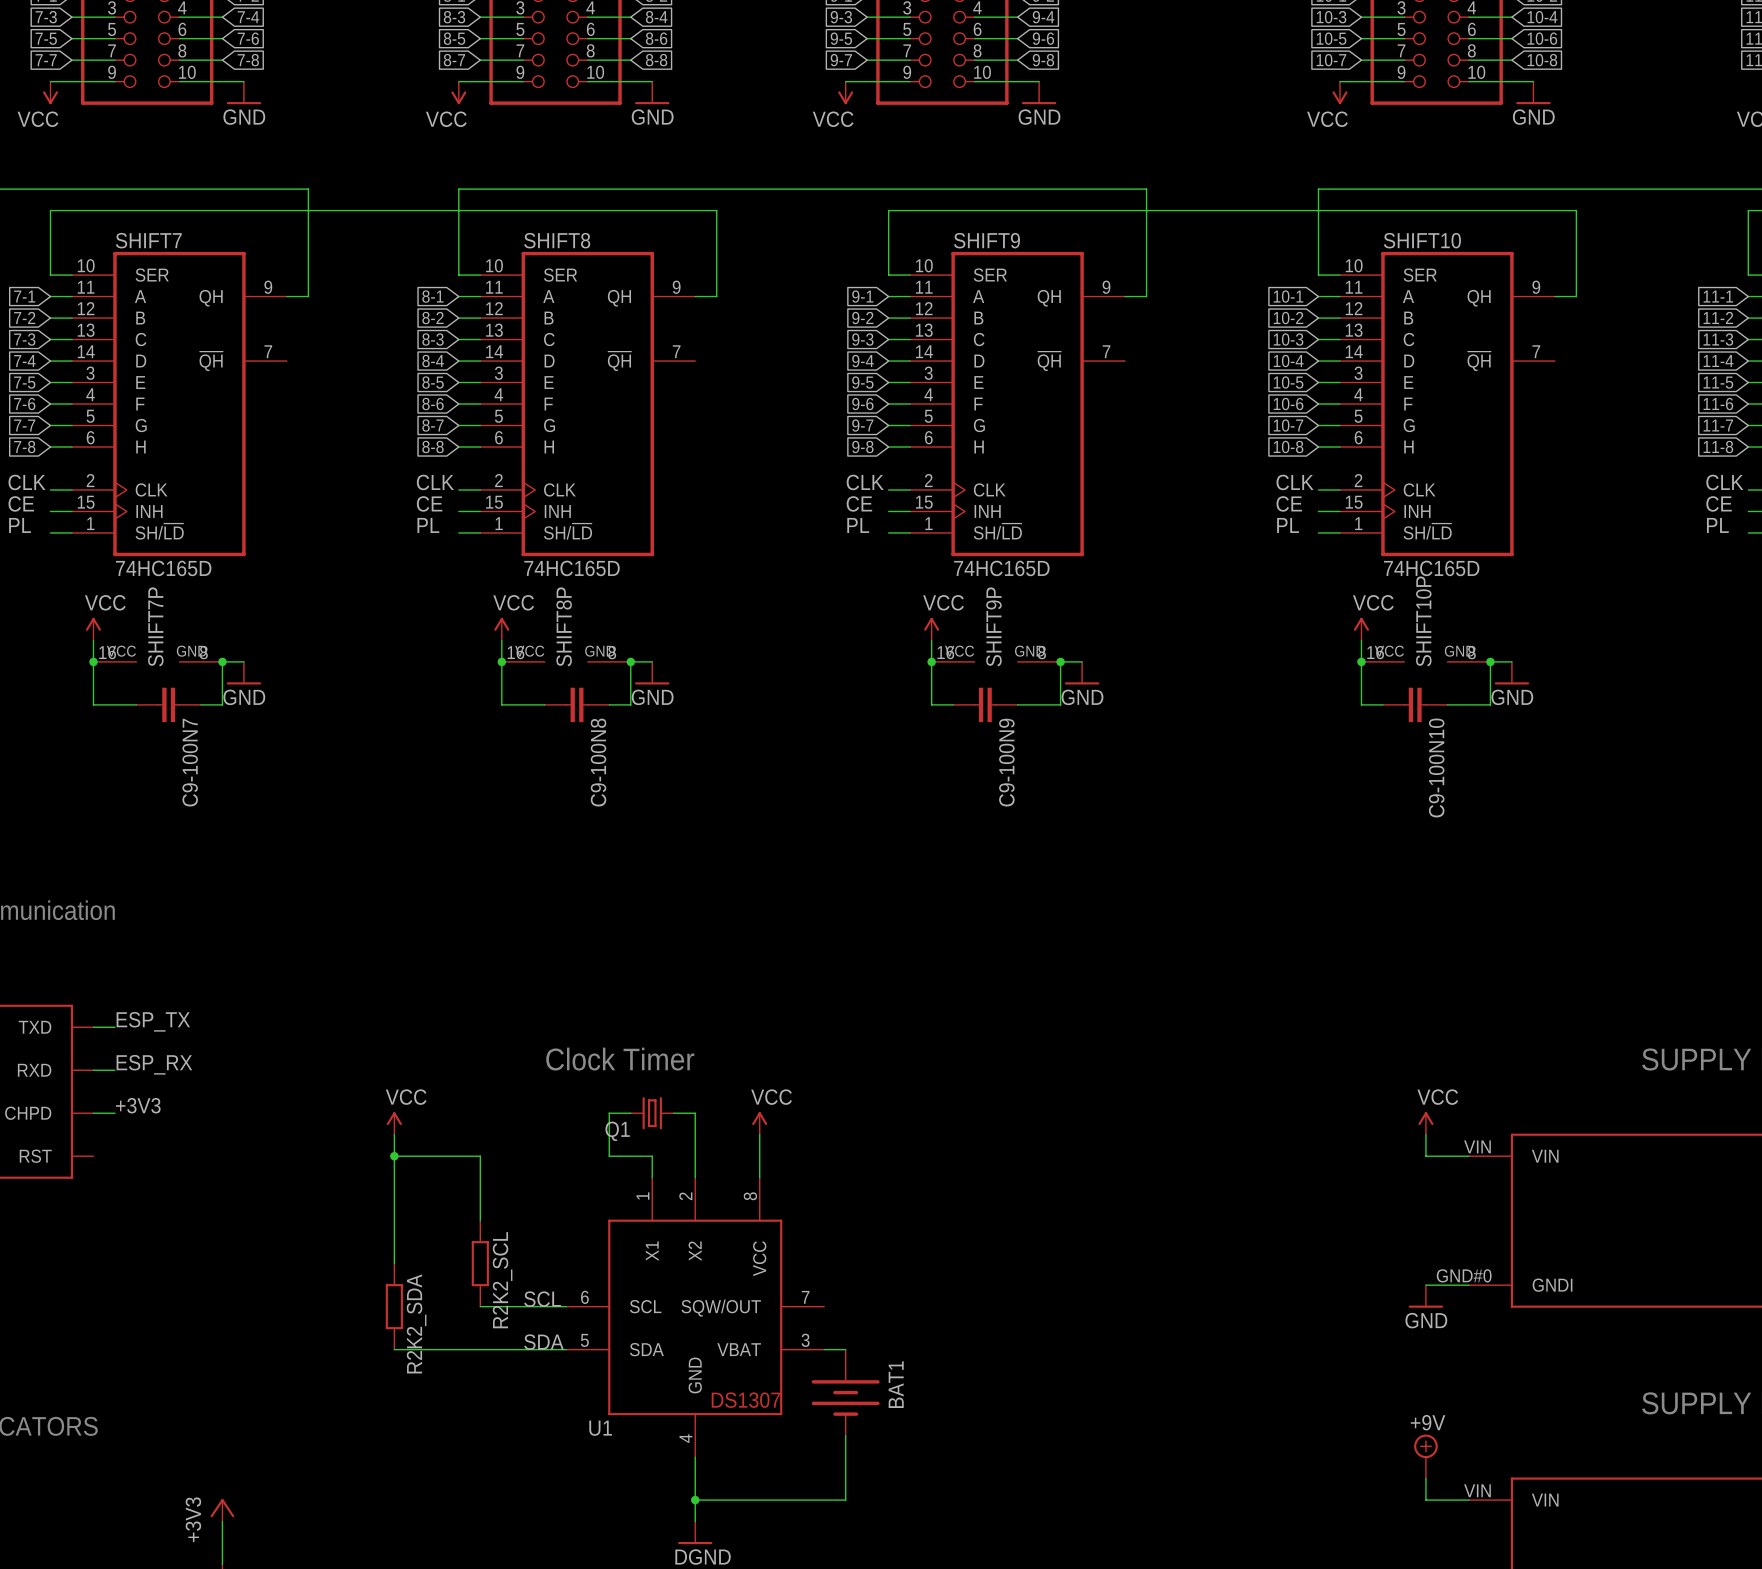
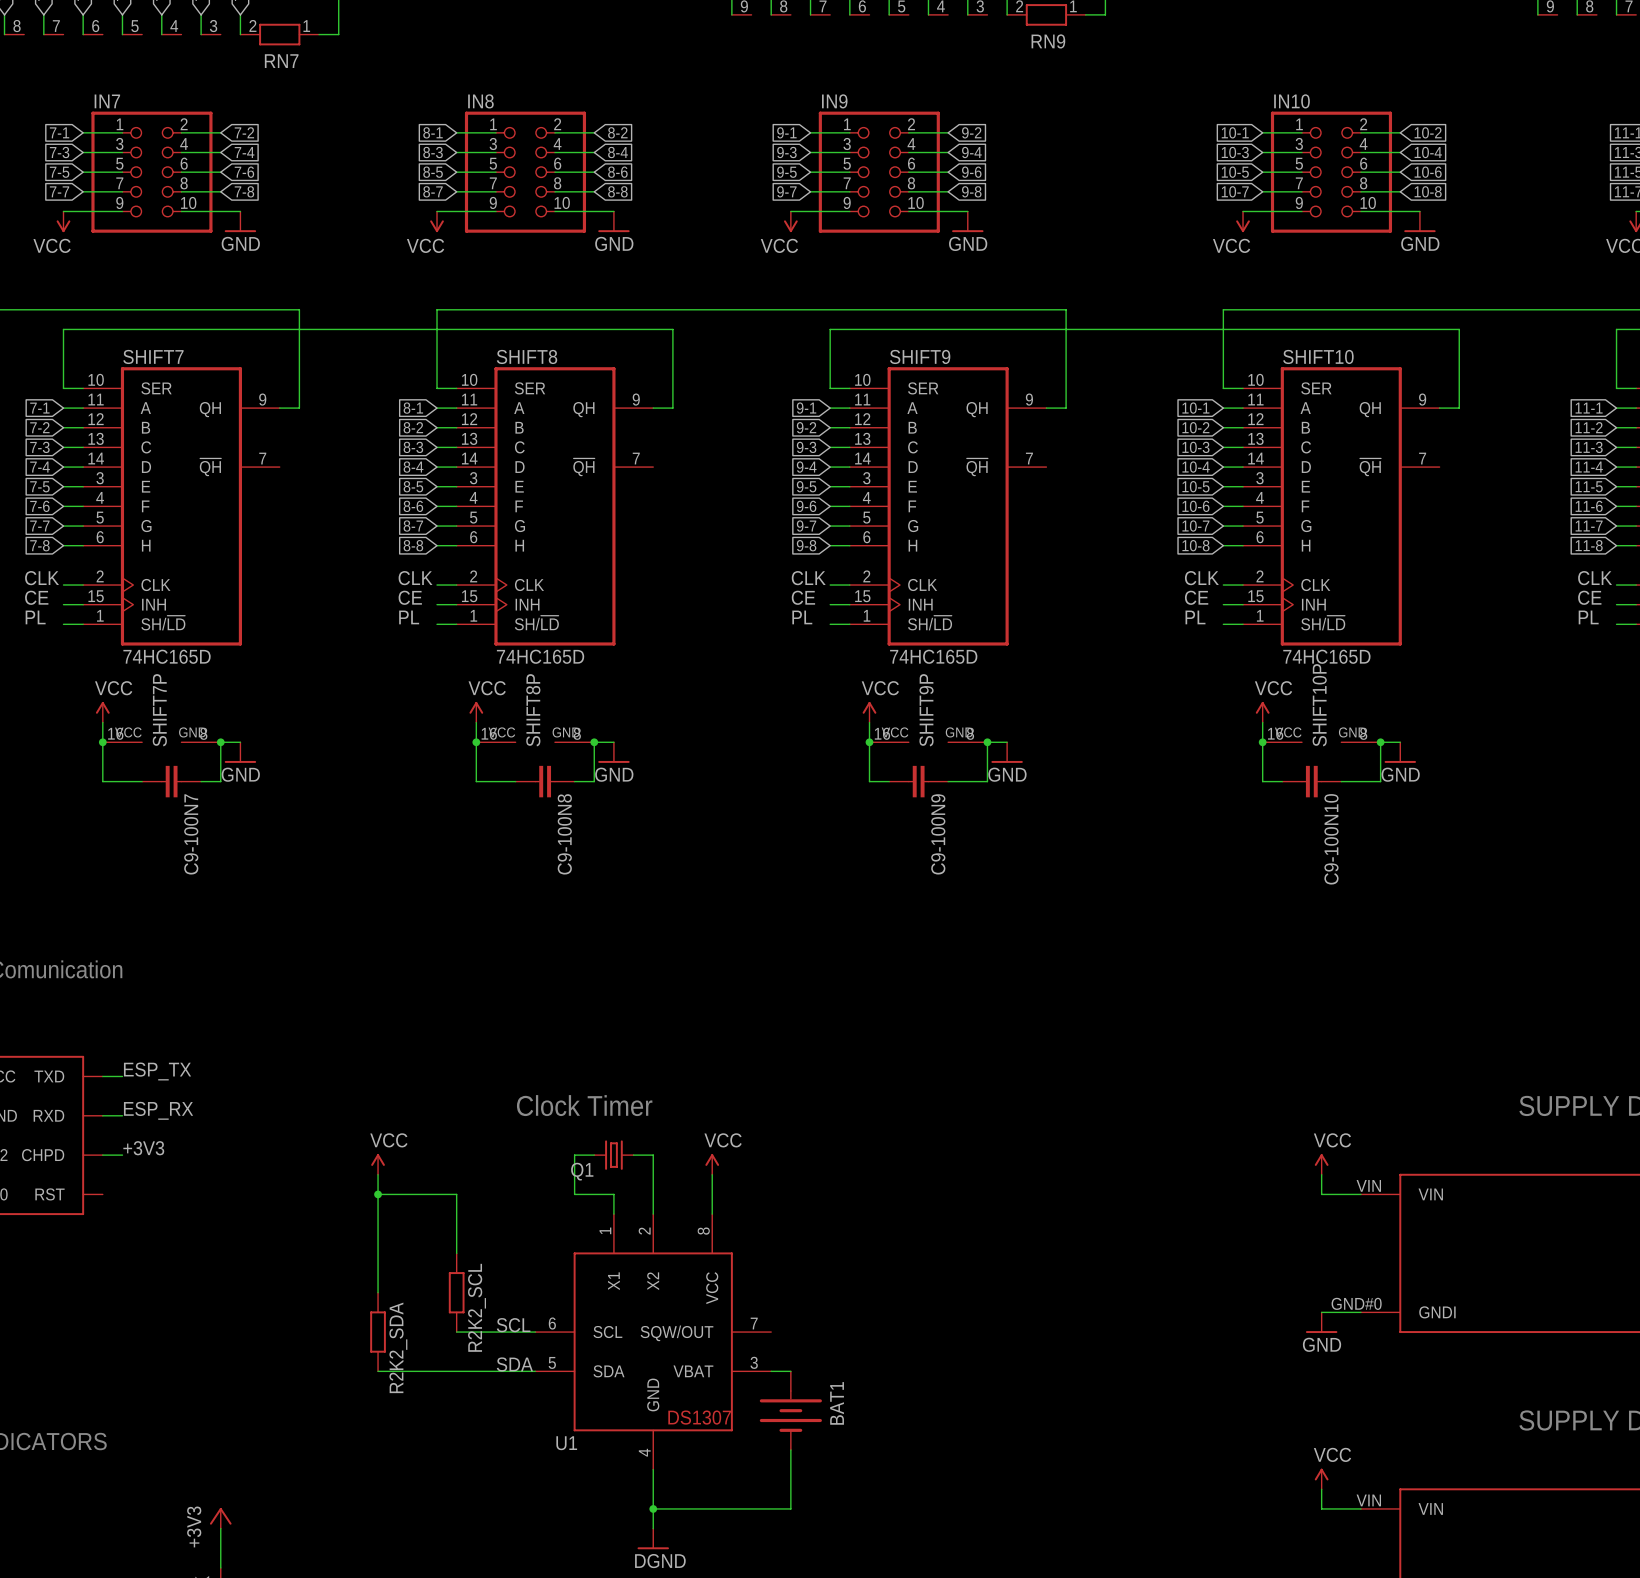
power symbol: +9V (1425, 1456) -> none
power symbol: none -> VCC (1321, 1478)

